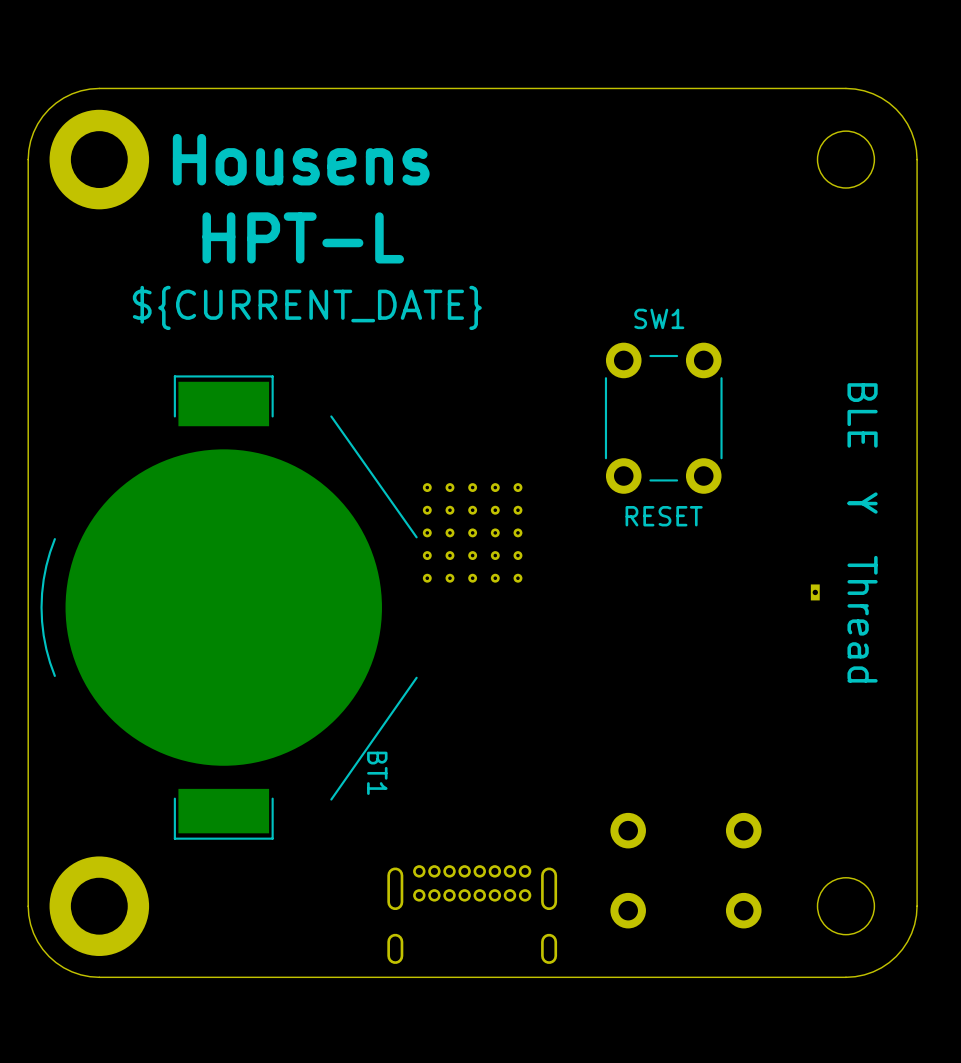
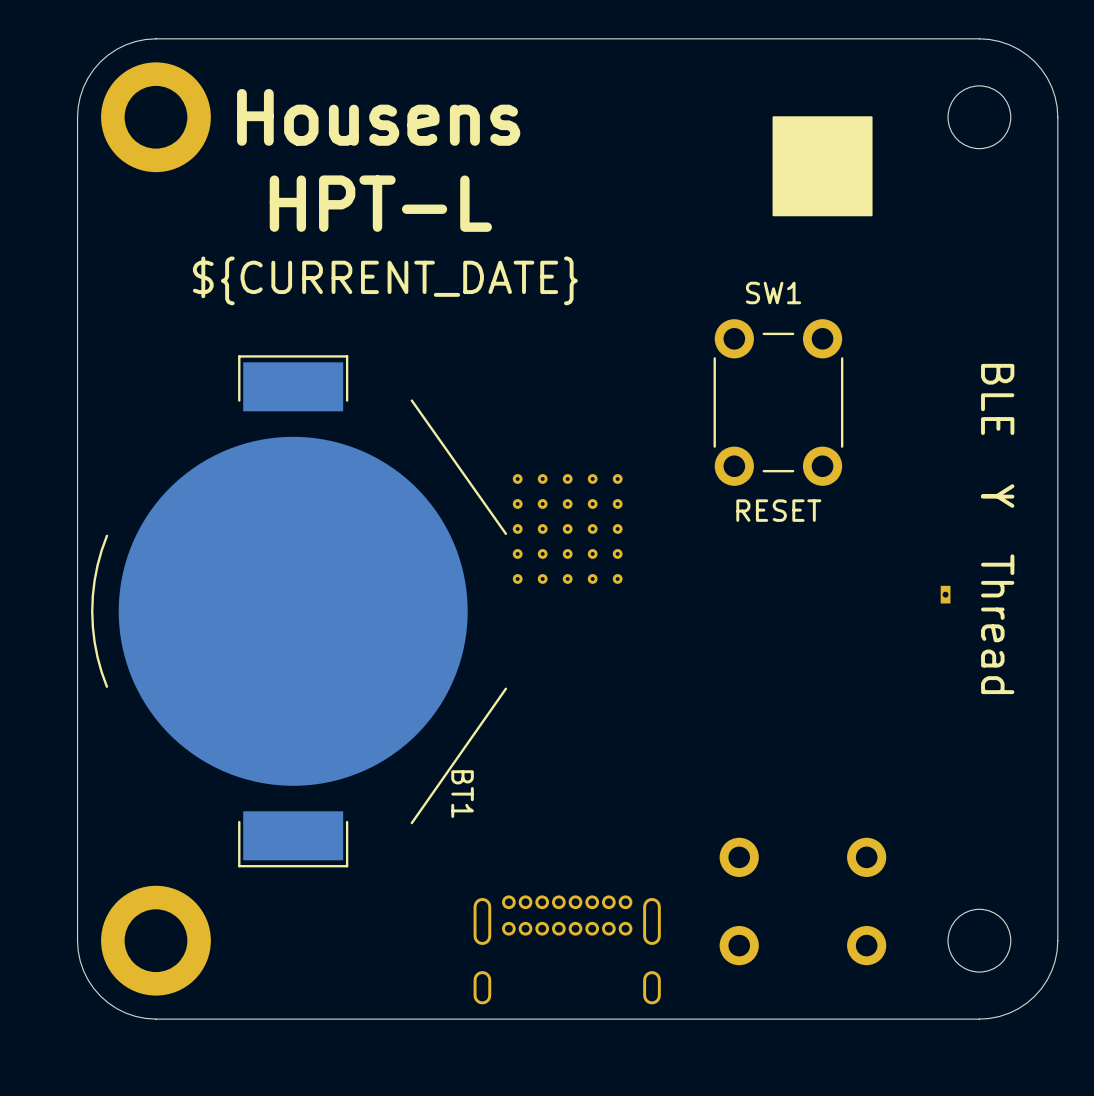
drawing: none -> [772, 116, 873, 217]

